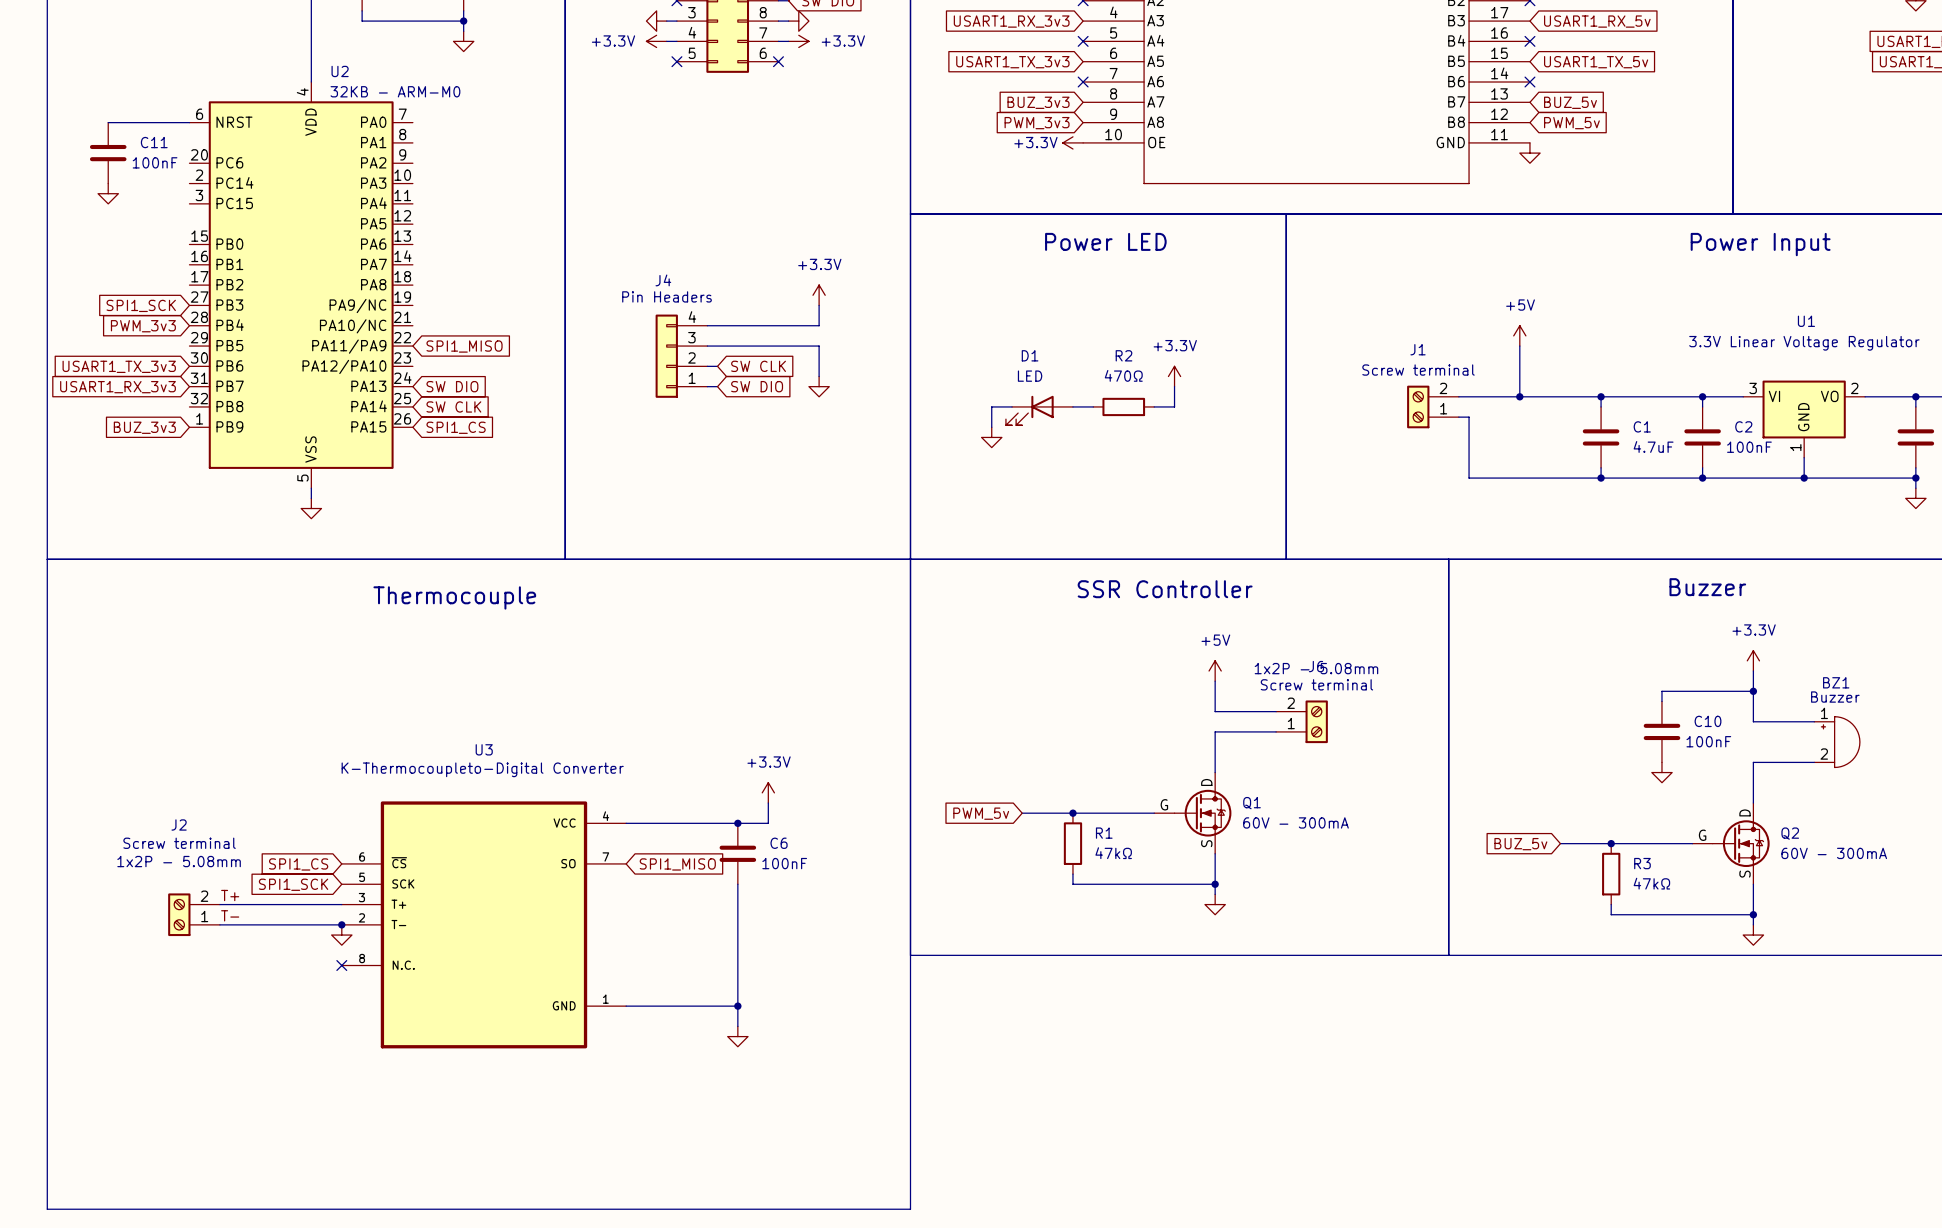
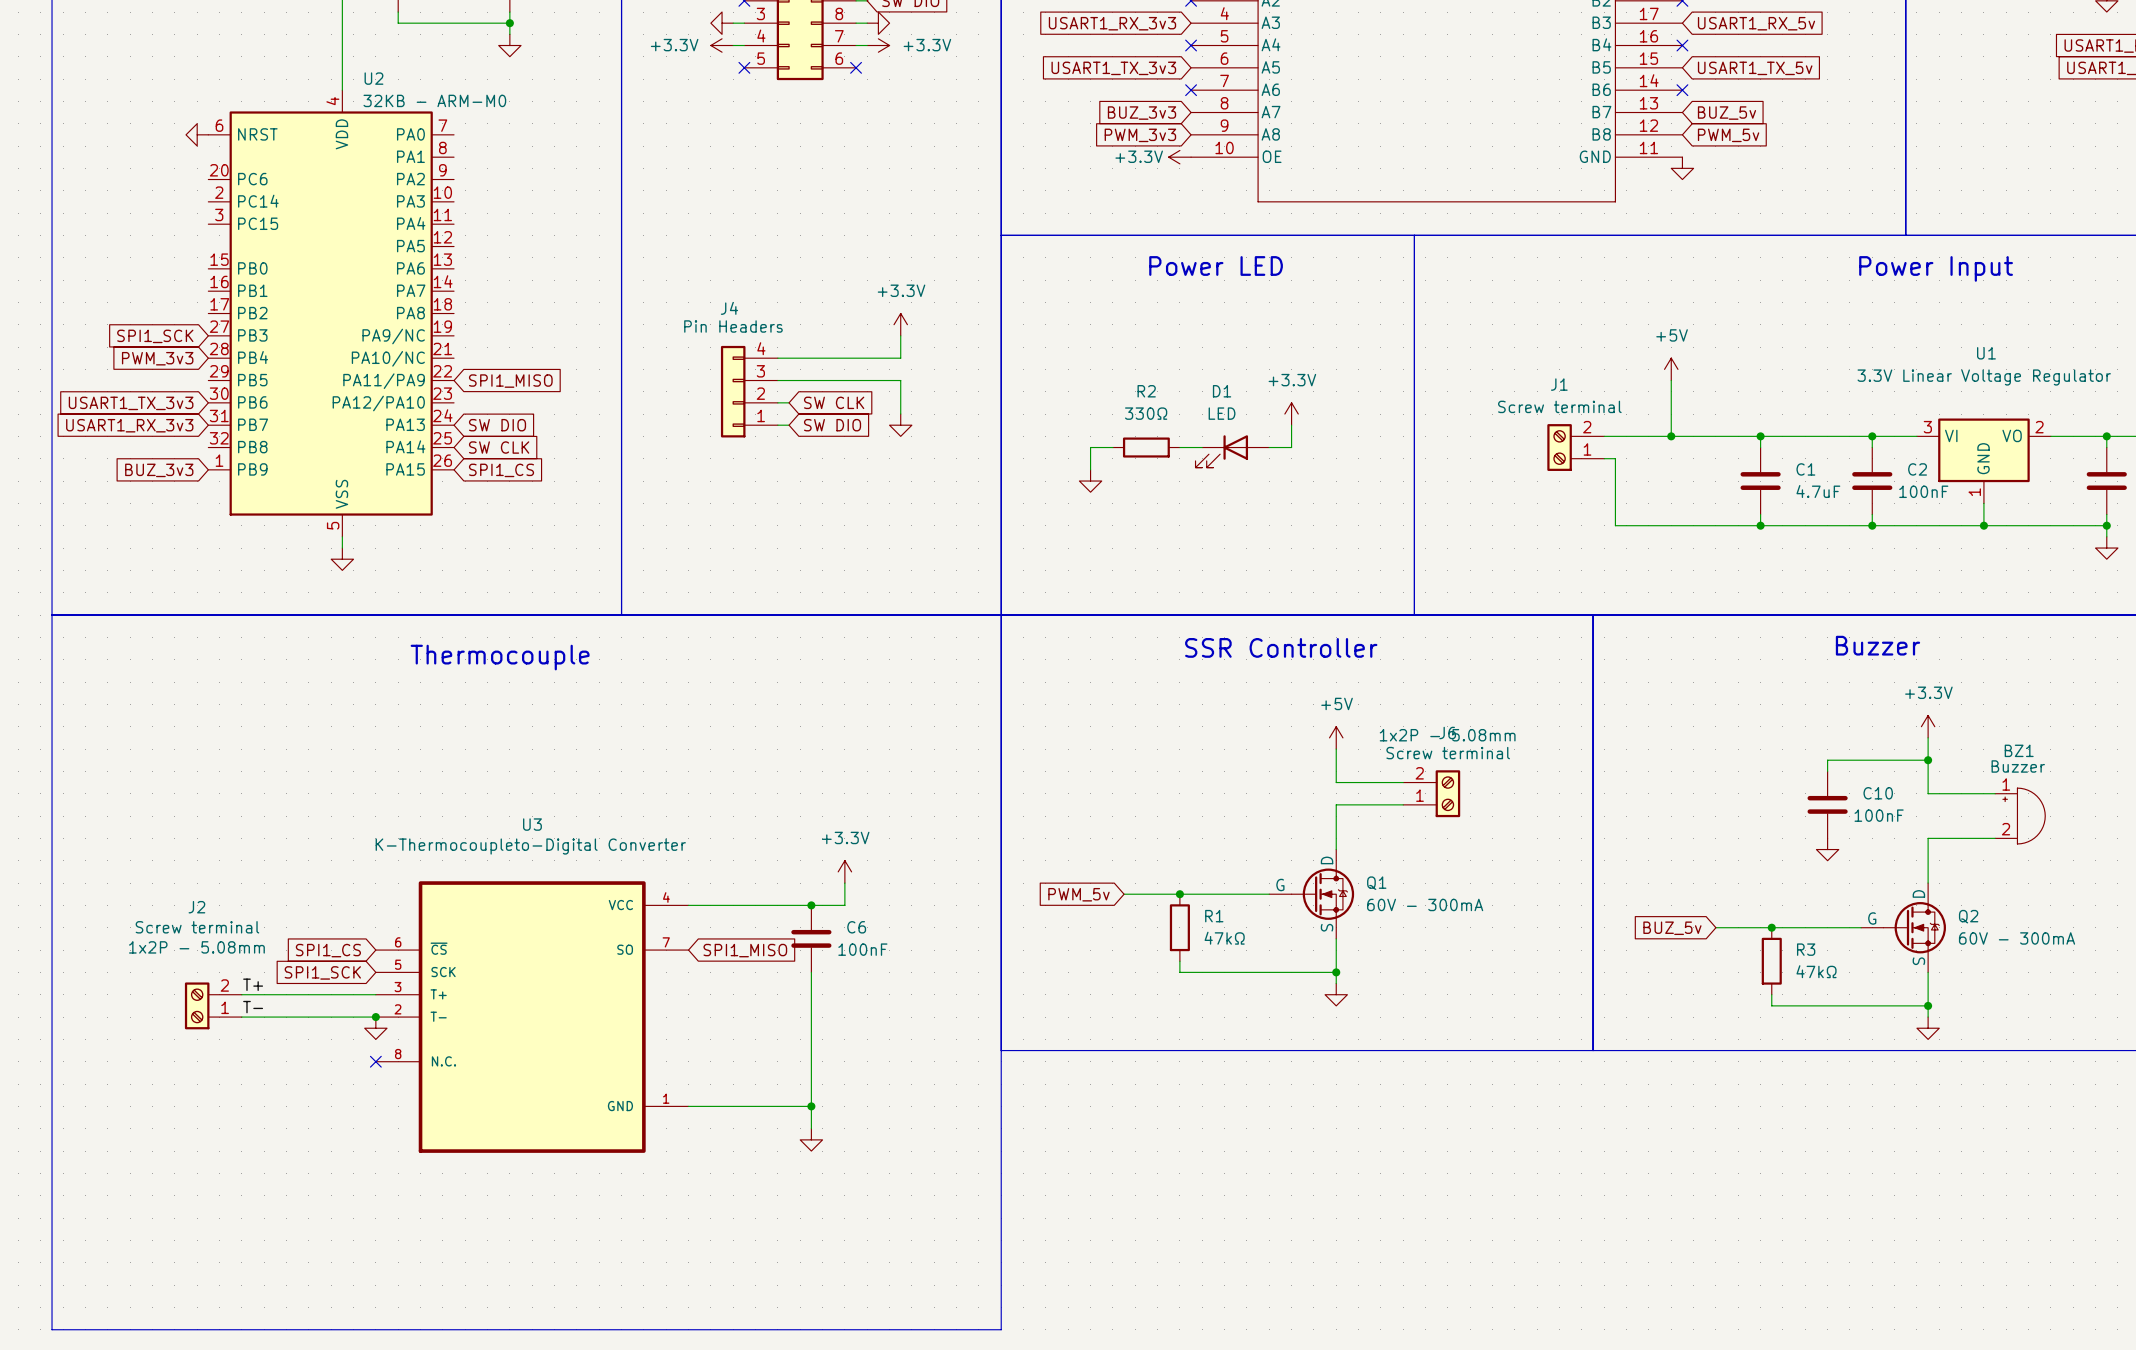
wire: (108, 122) (189, 122) -> none
C11: 100nF (108, 153) -> none
power symbol rotation: 0° (108, 193) -> 90° clockwise (197, 134)
power symbol position: (108, 193) -> (197, 134)
R2 value: 470Ω (1123, 375) -> 330Ω (1146, 413)
R2 position: (1123, 406) -> (1146, 447)
D1 position: (1039, 410) -> (1232, 451)

